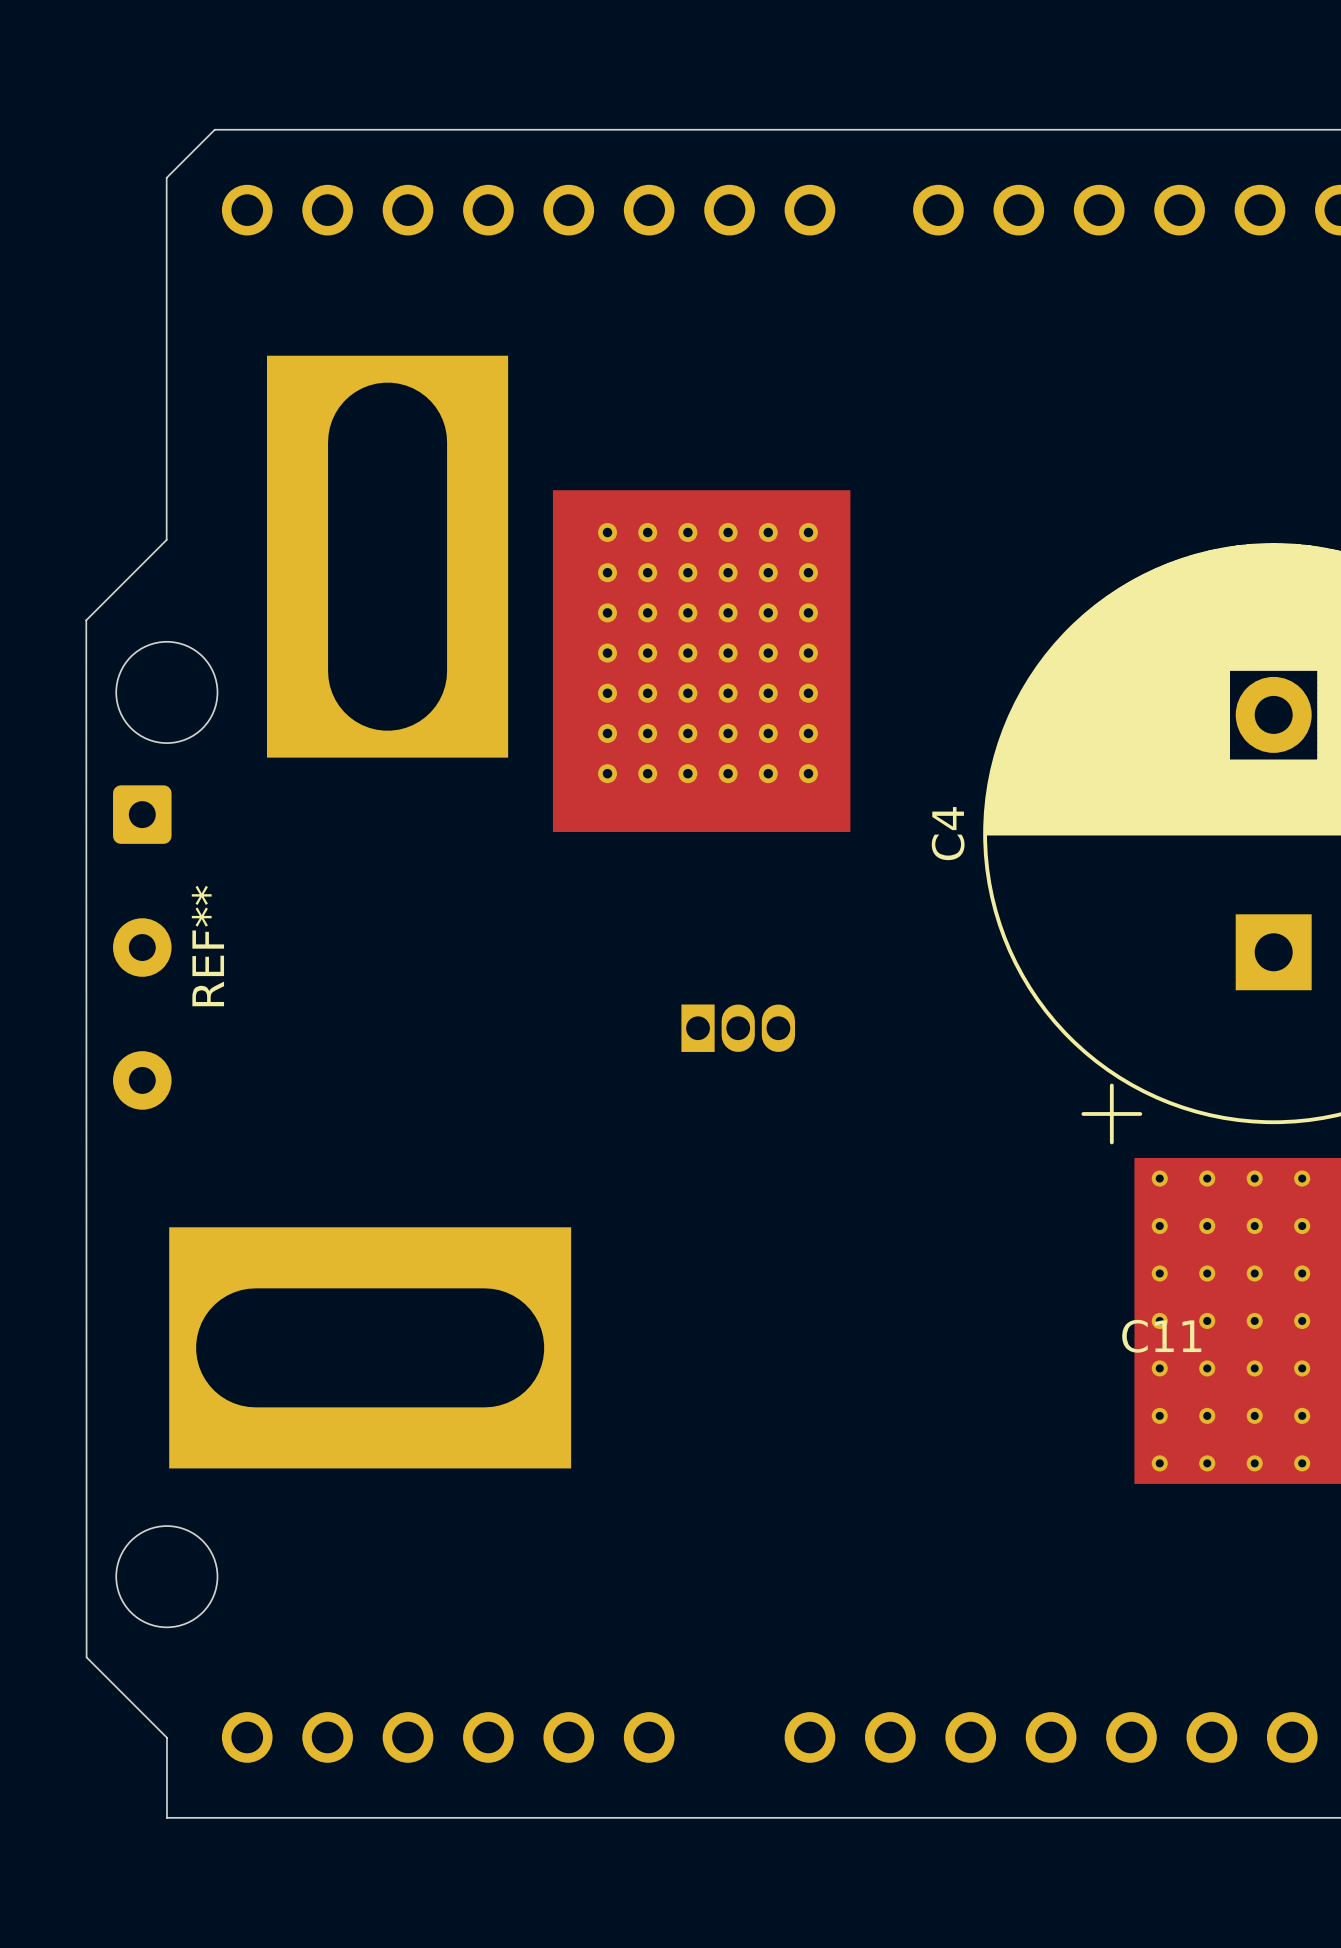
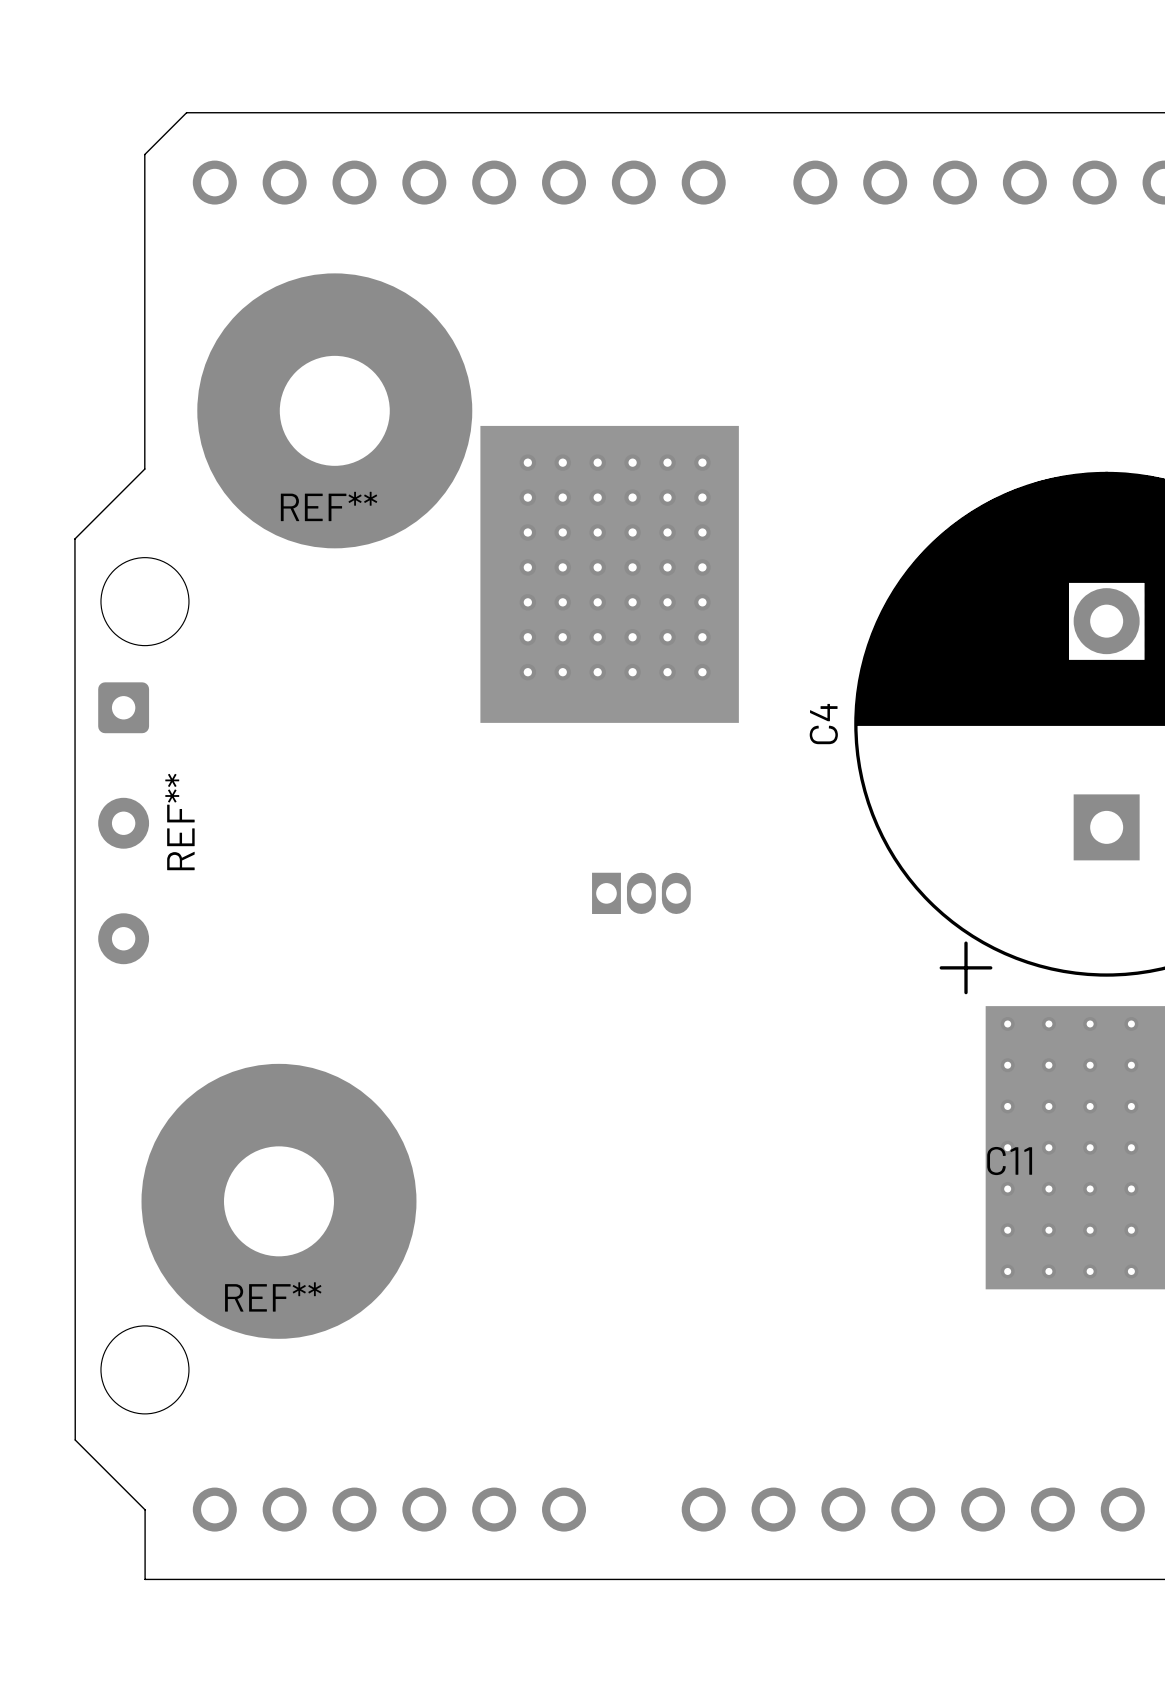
REF**: none -> (334, 410)
part: (387, 556) -> none
part: (370, 1347) -> none
REF**: none -> (278, 1201)

